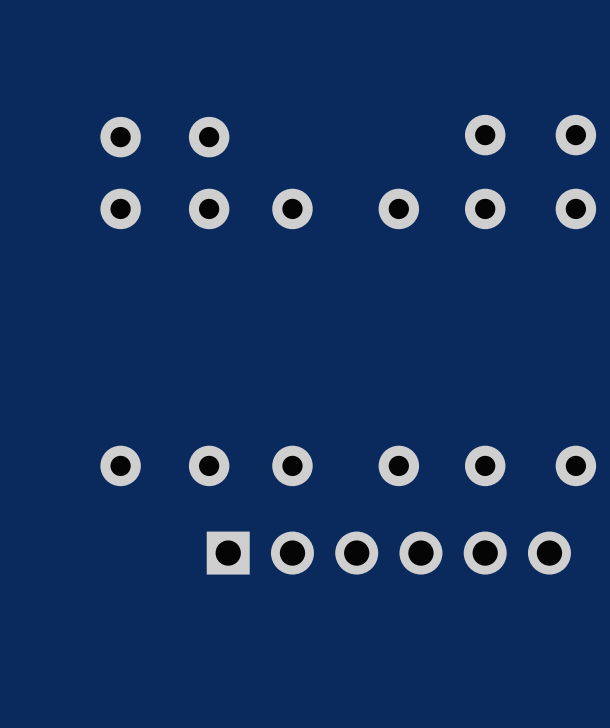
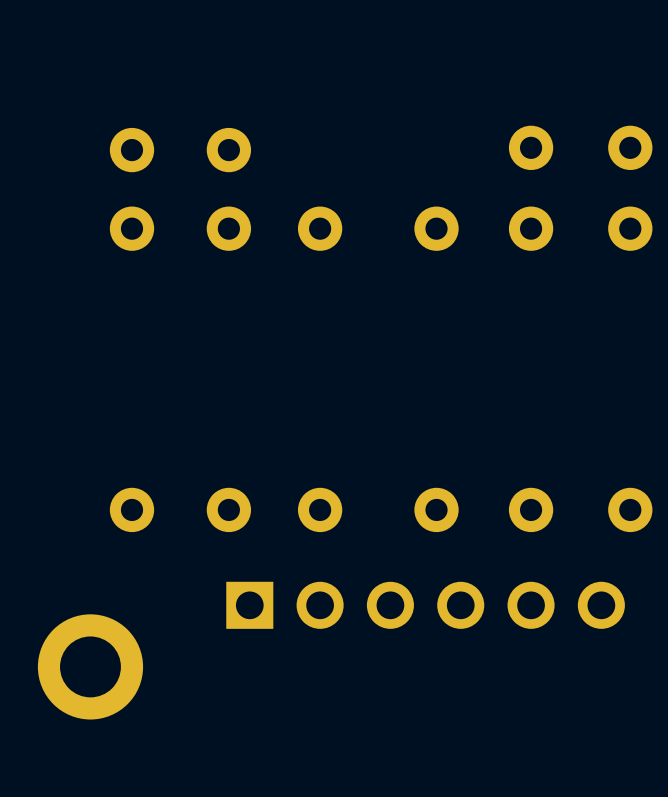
part: none -> (90, 666)

